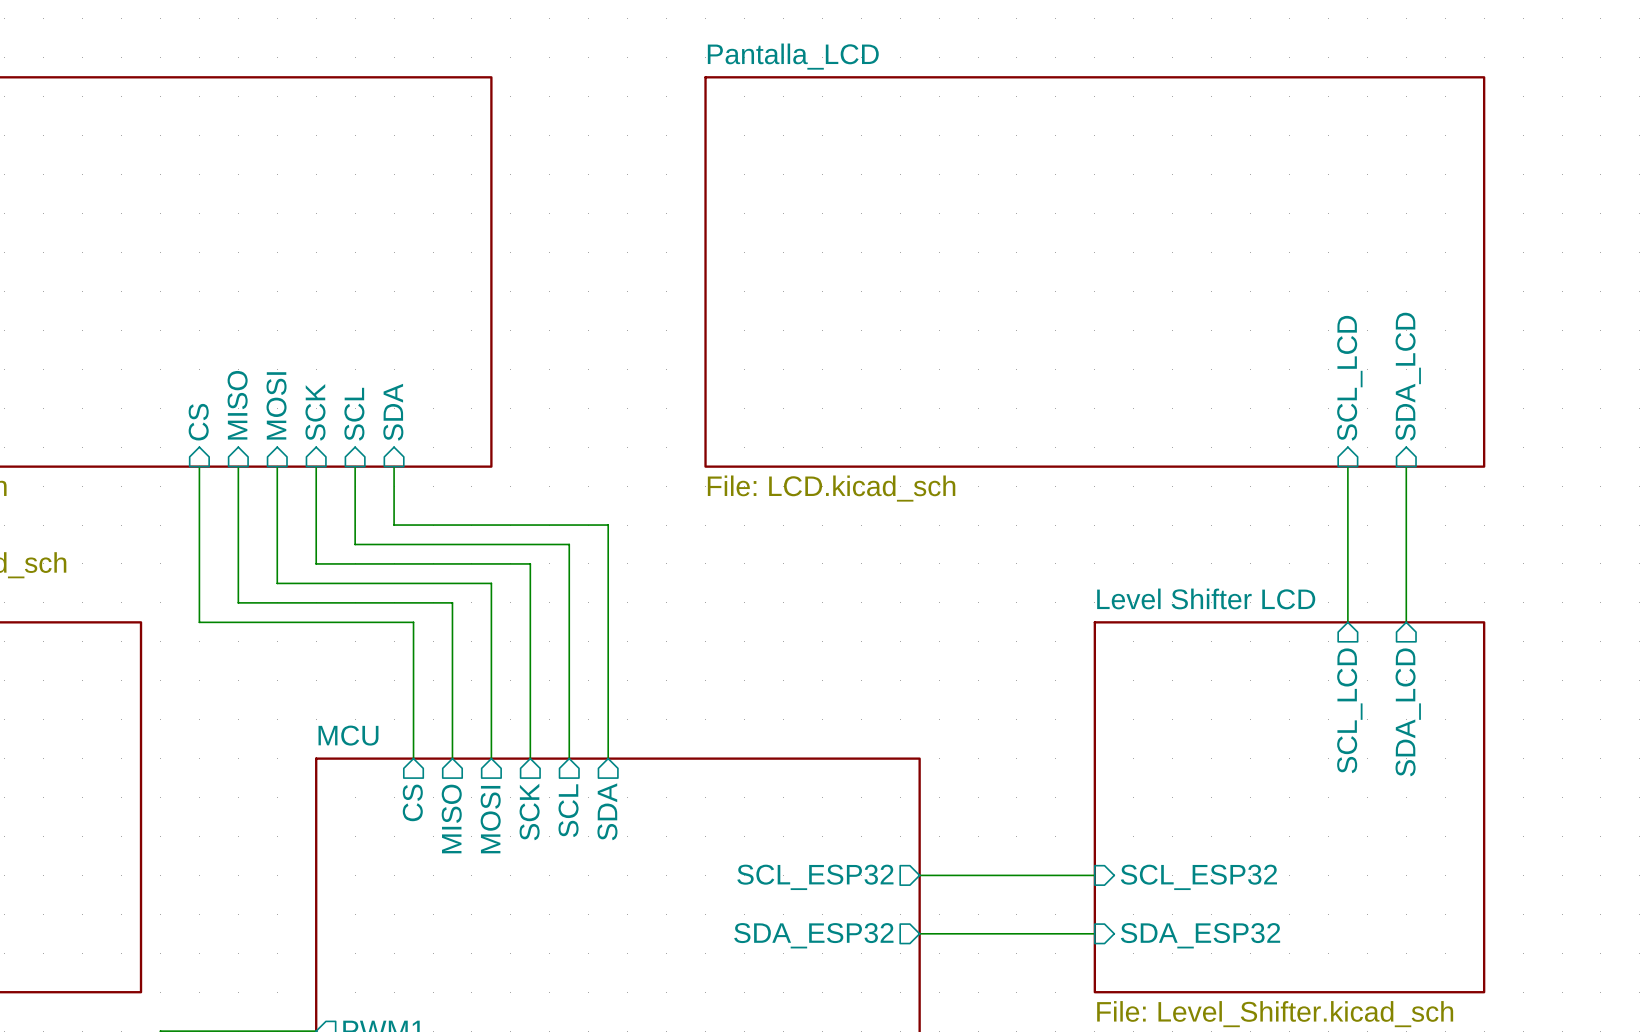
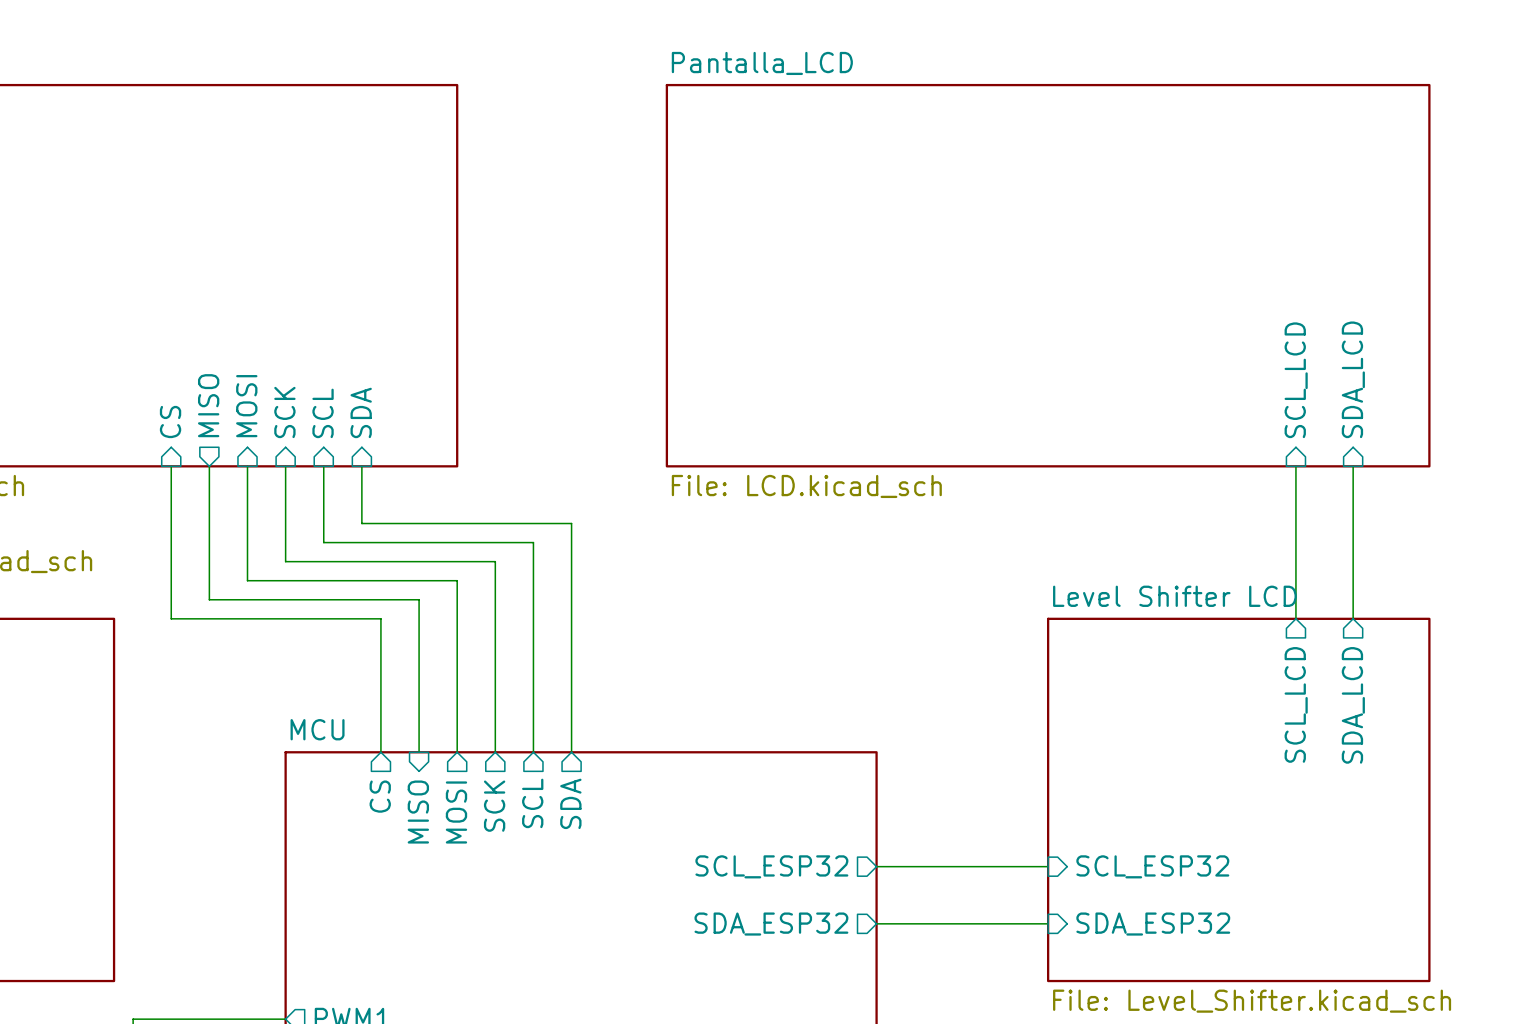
sheet pin shape: input (237, 405) -> output (208, 405)
sheet pin shape: output (451, 819) -> input (418, 812)

